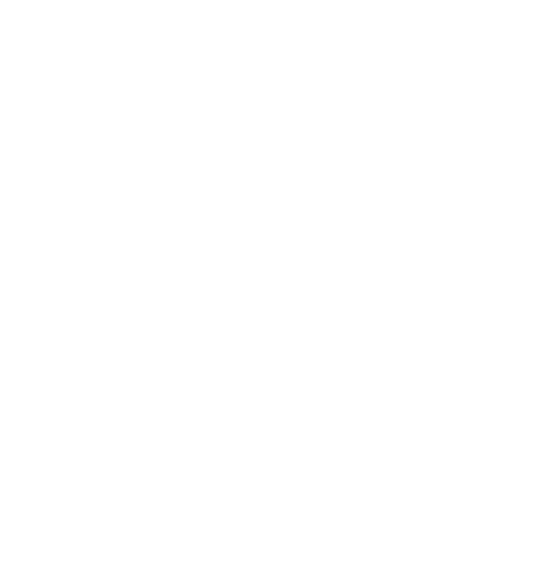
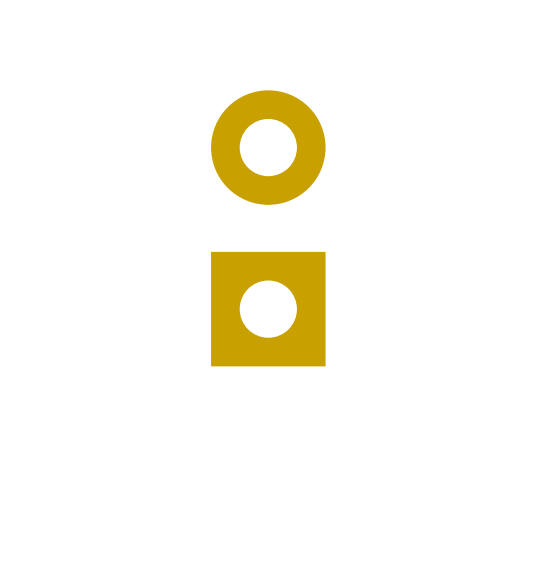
part: none -> (268, 228)

